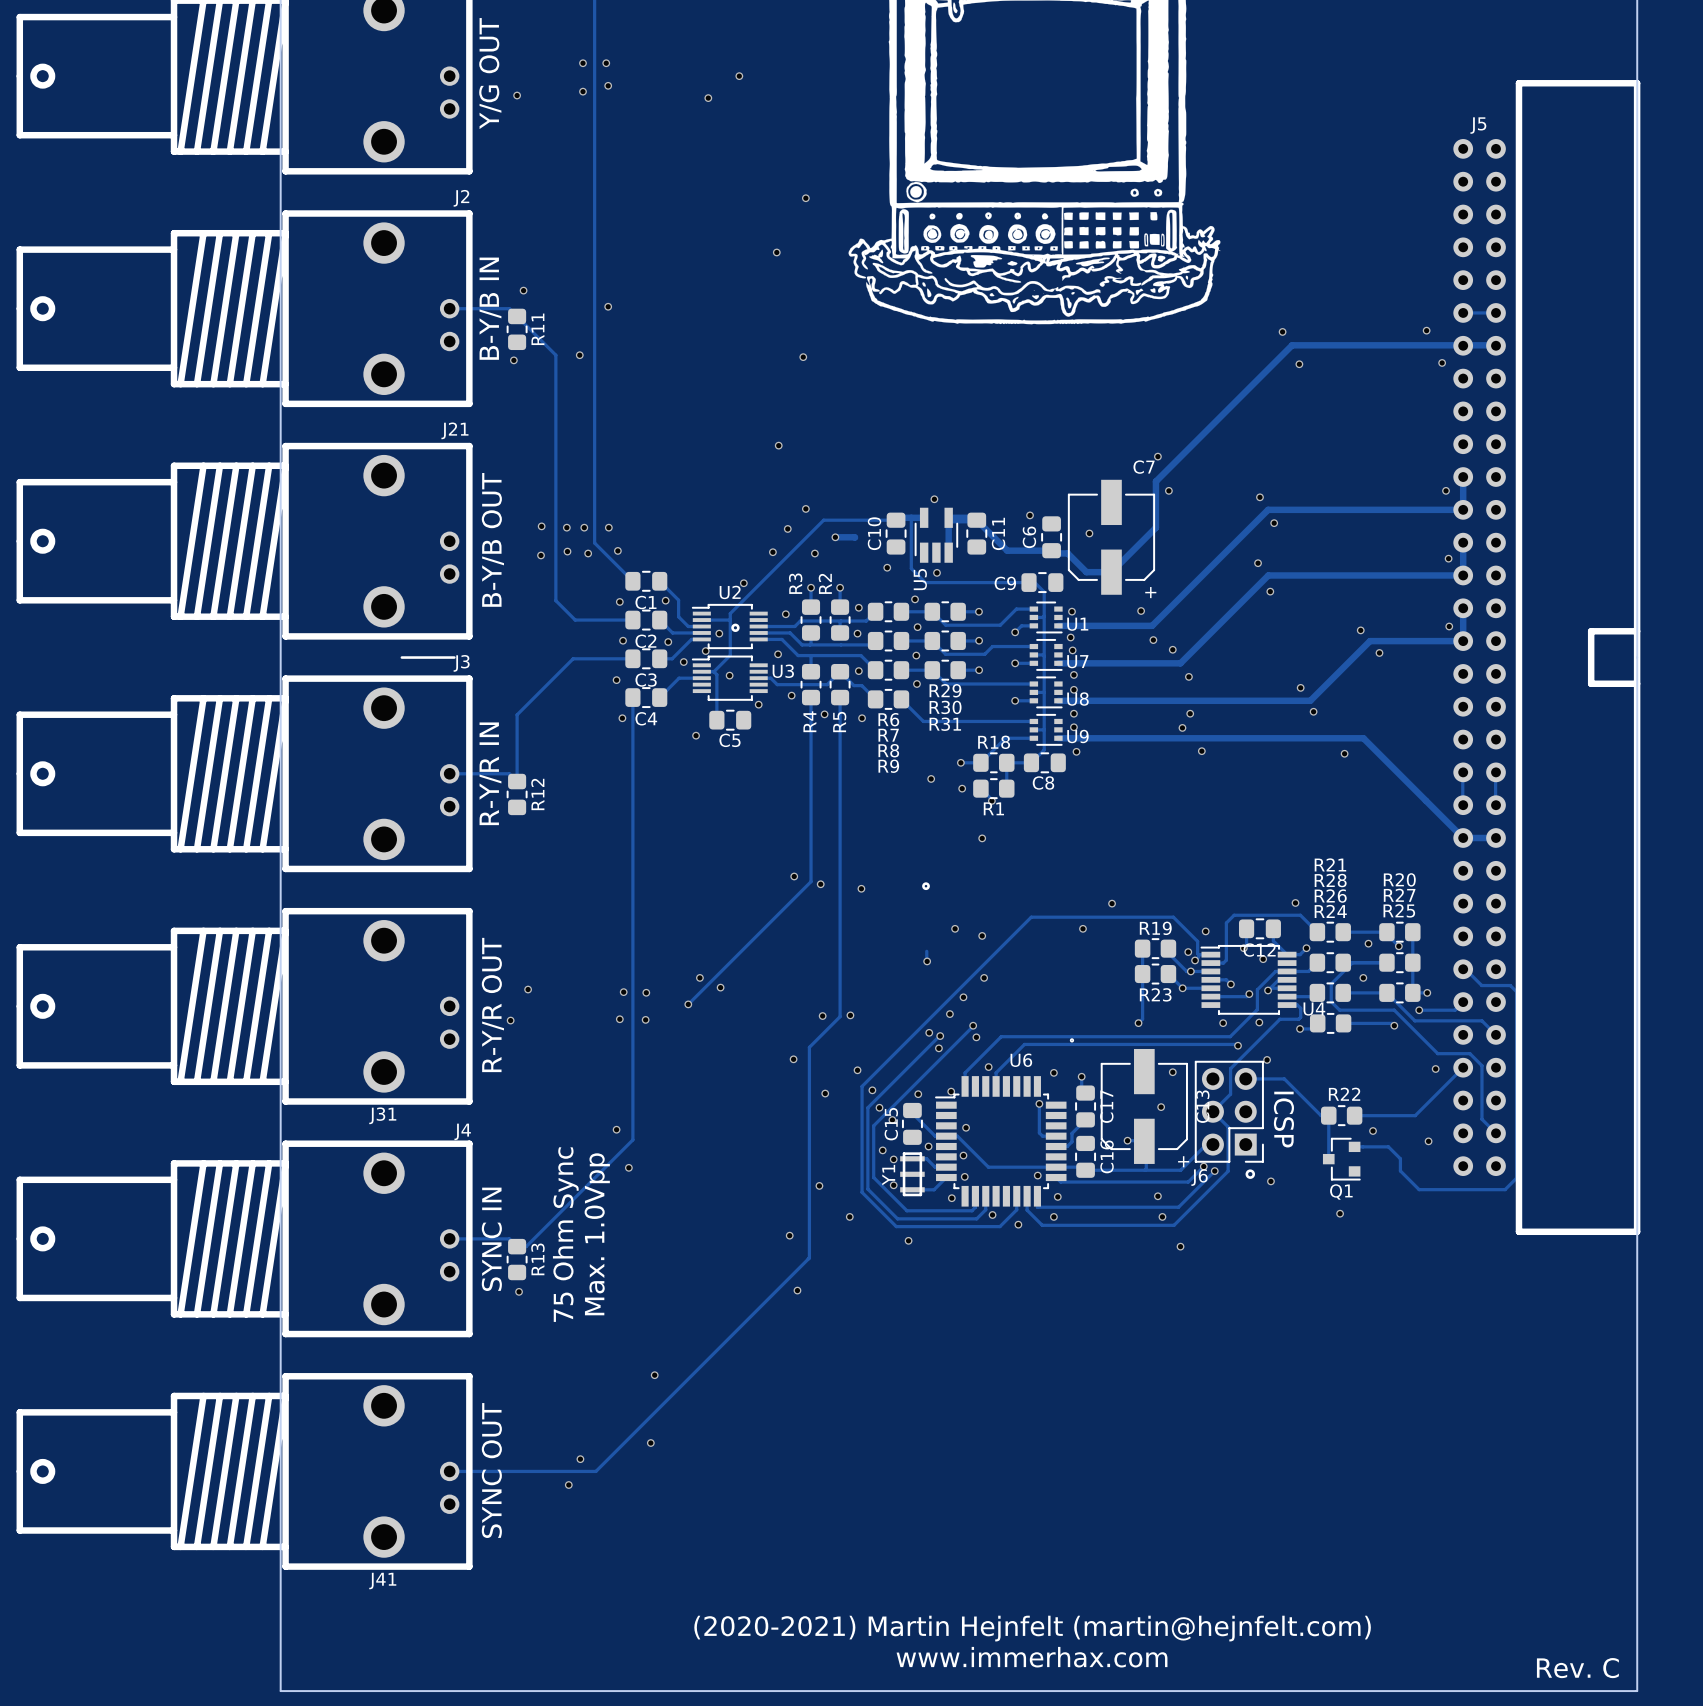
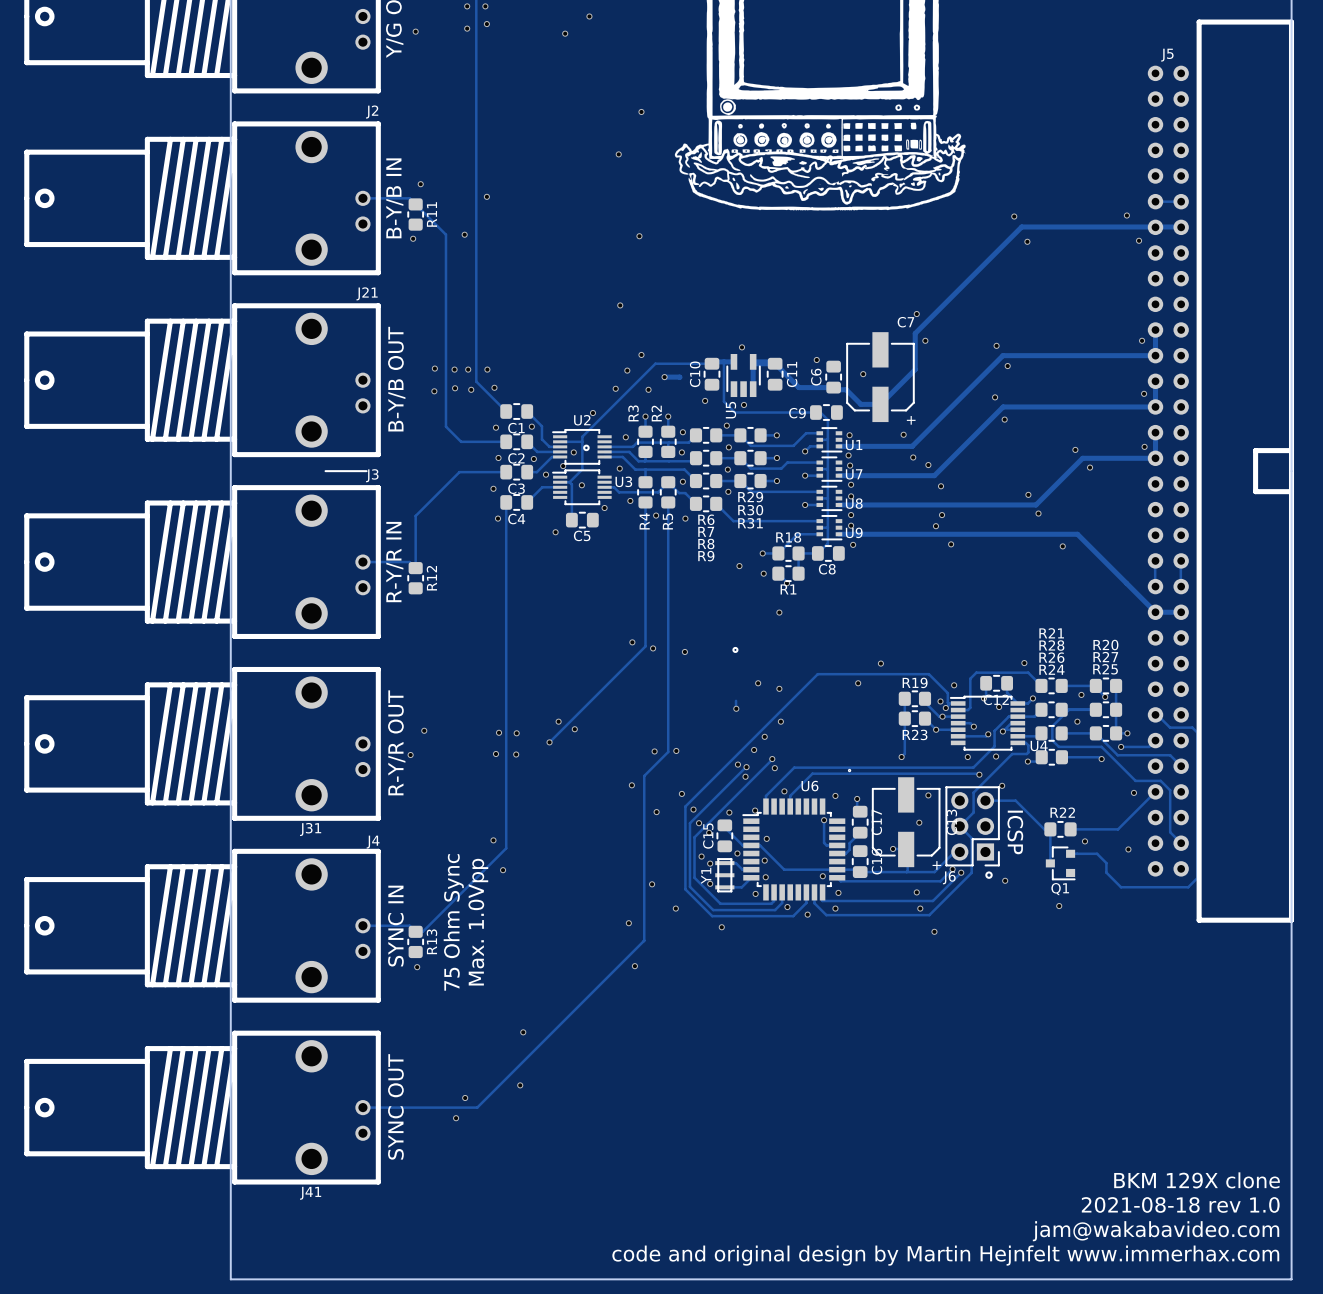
text: none -> BKM 129X clone (1197, 1180)
text: none -> 2021-08-18 rev 1.0 (1180, 1204)
text: (2020-2021) Martin Hejnfelt (martin@hejnfelt.com) (1032, 1628) -> none
text: none -> jam@wakabavideo.com (1156, 1231)
text: www.immerhax.com (1032, 1657) -> none
text: none -> code and original design by Martin Hejnfelt www.immerhax.com (945, 1255)
text: Rev. C (1577, 1668) -> none

